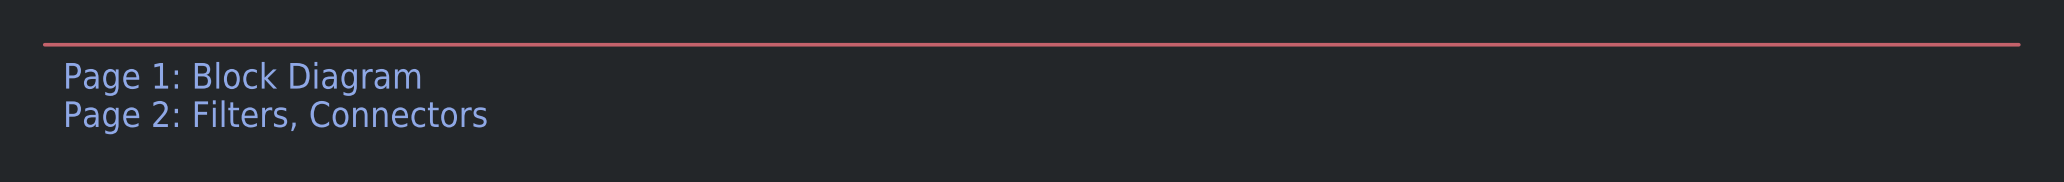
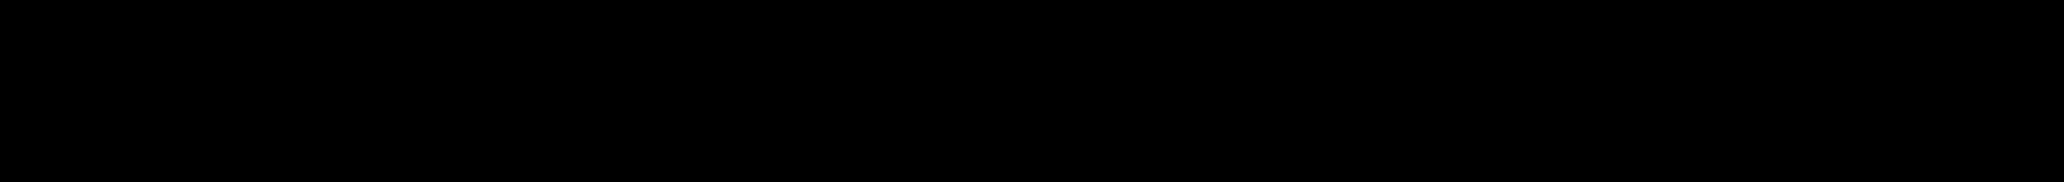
line: (44, 44) (2018, 44) -> none
text: Page 1: Block Diagram (243, 78) -> none
text: Page 2: Filters, Connectors (276, 117) -> none

